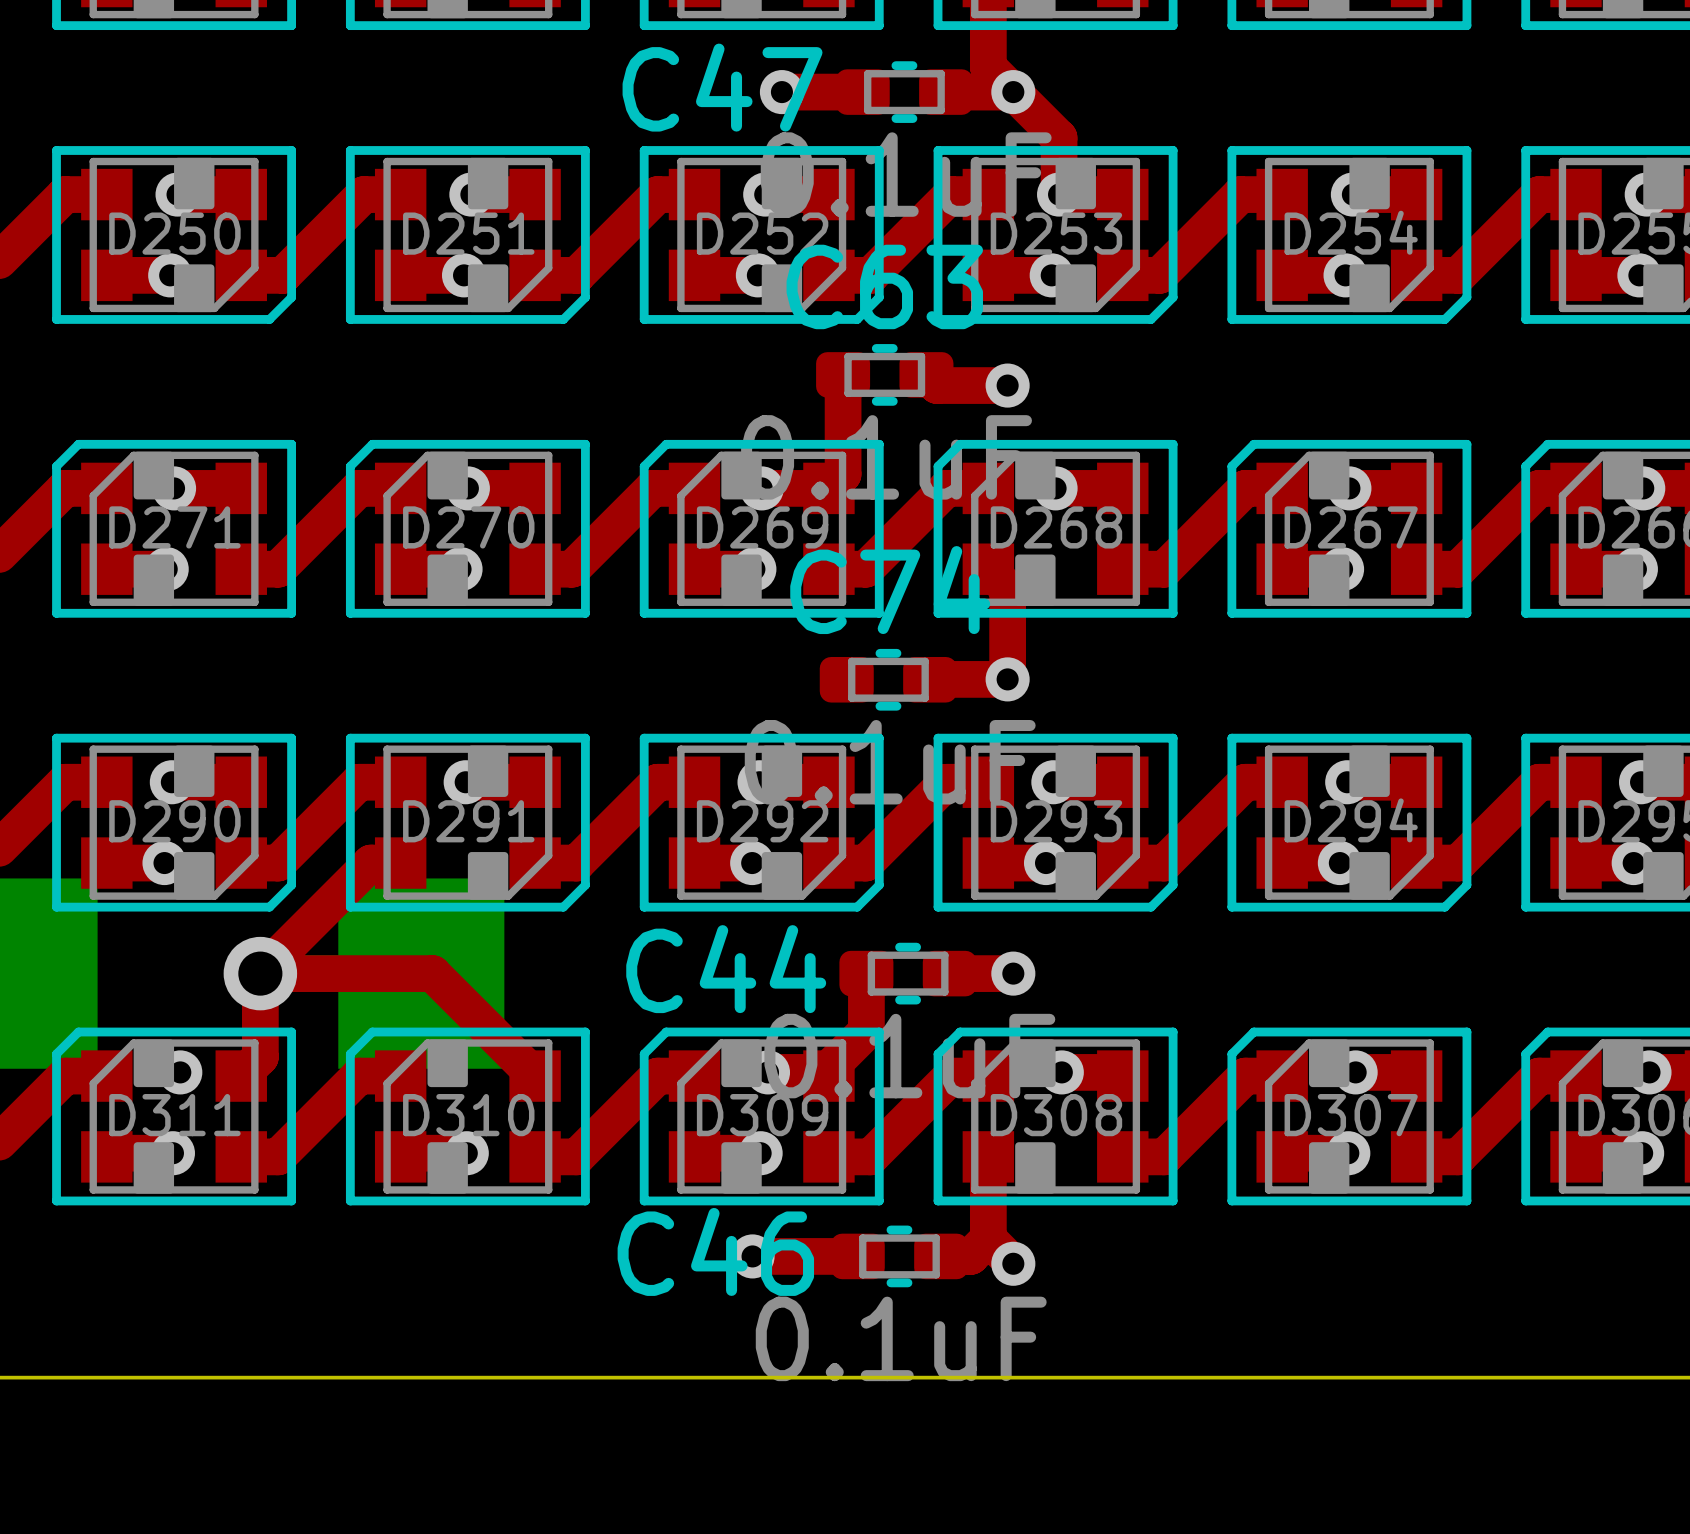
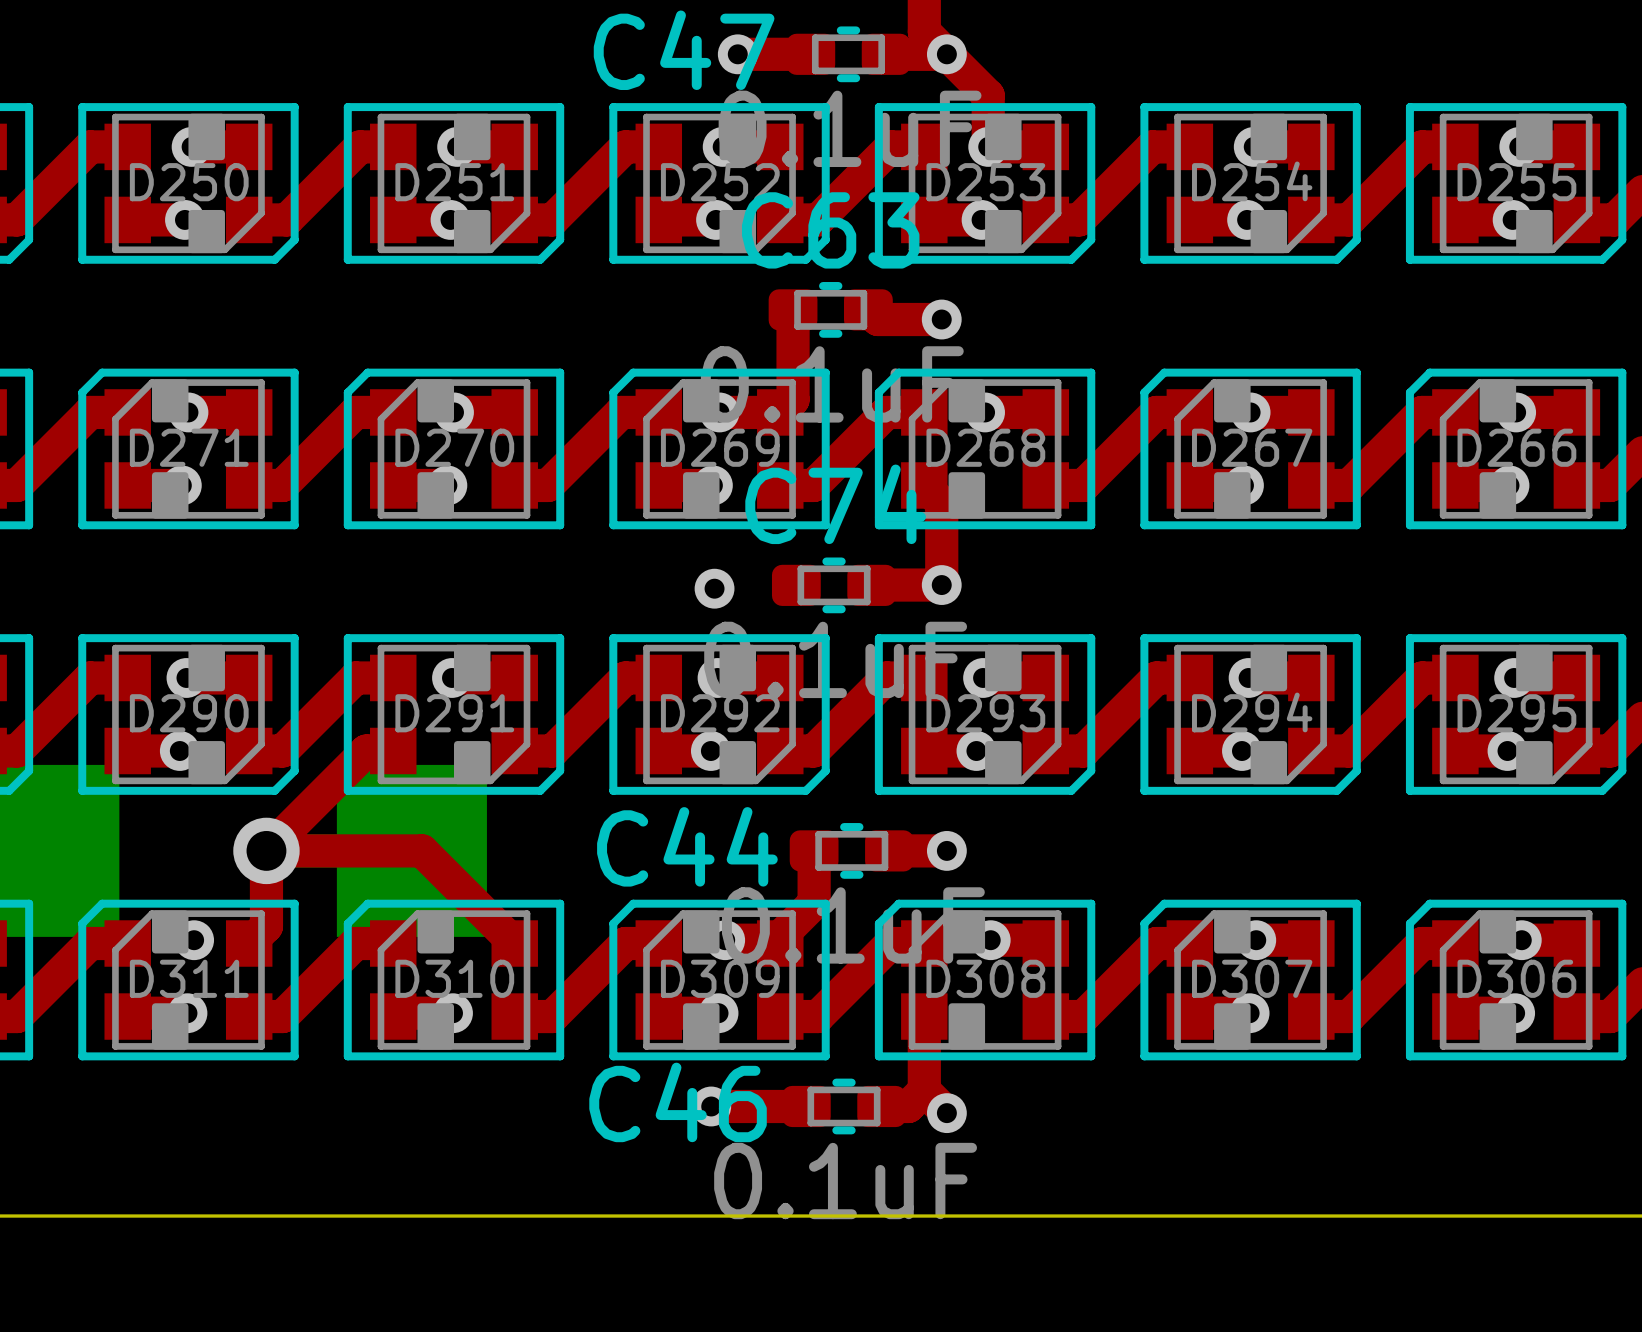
via: none -> (714, 588)

